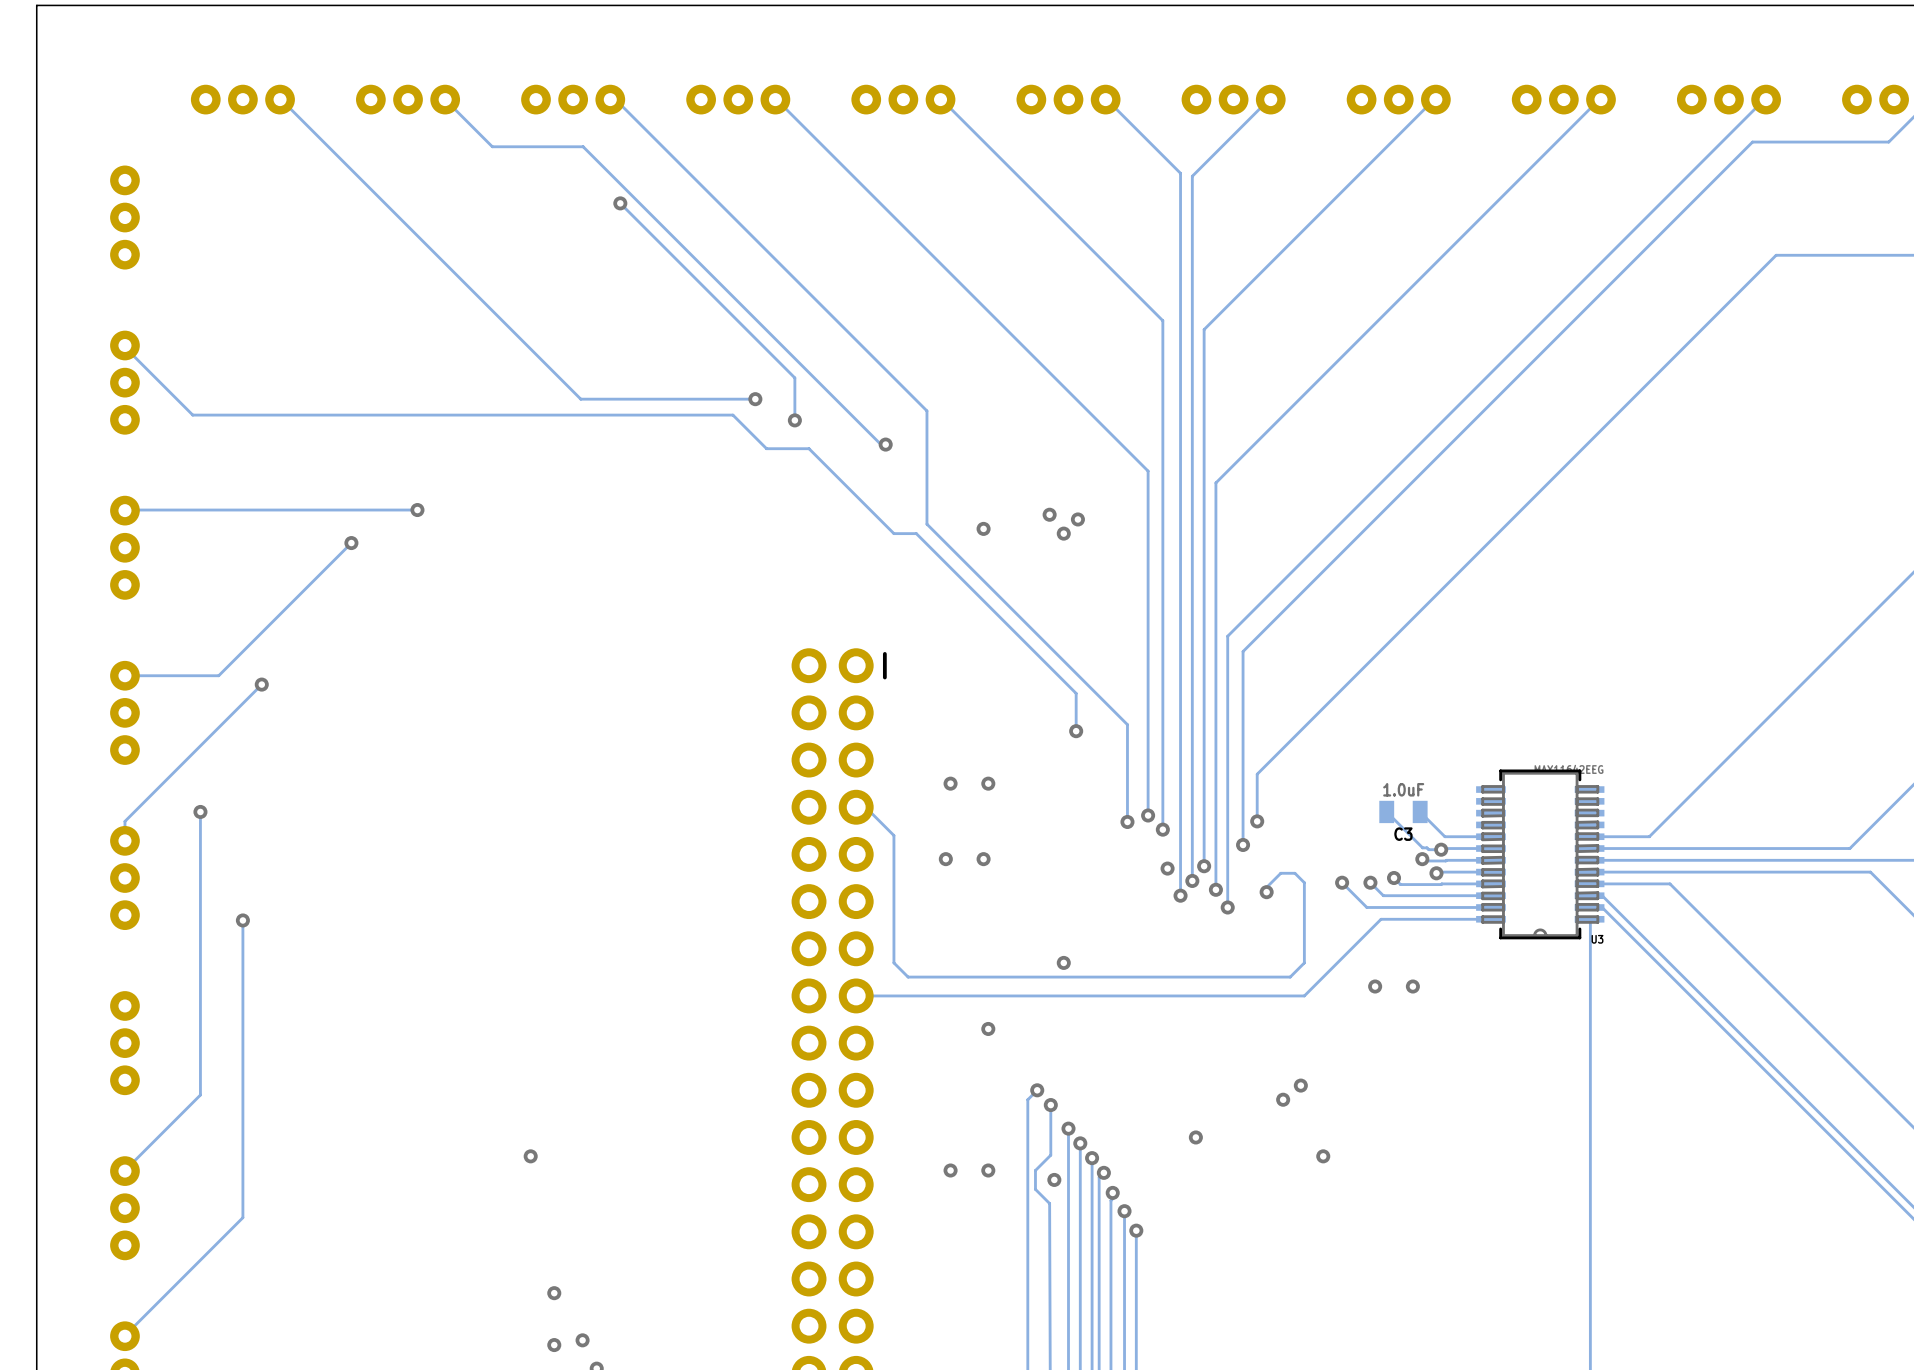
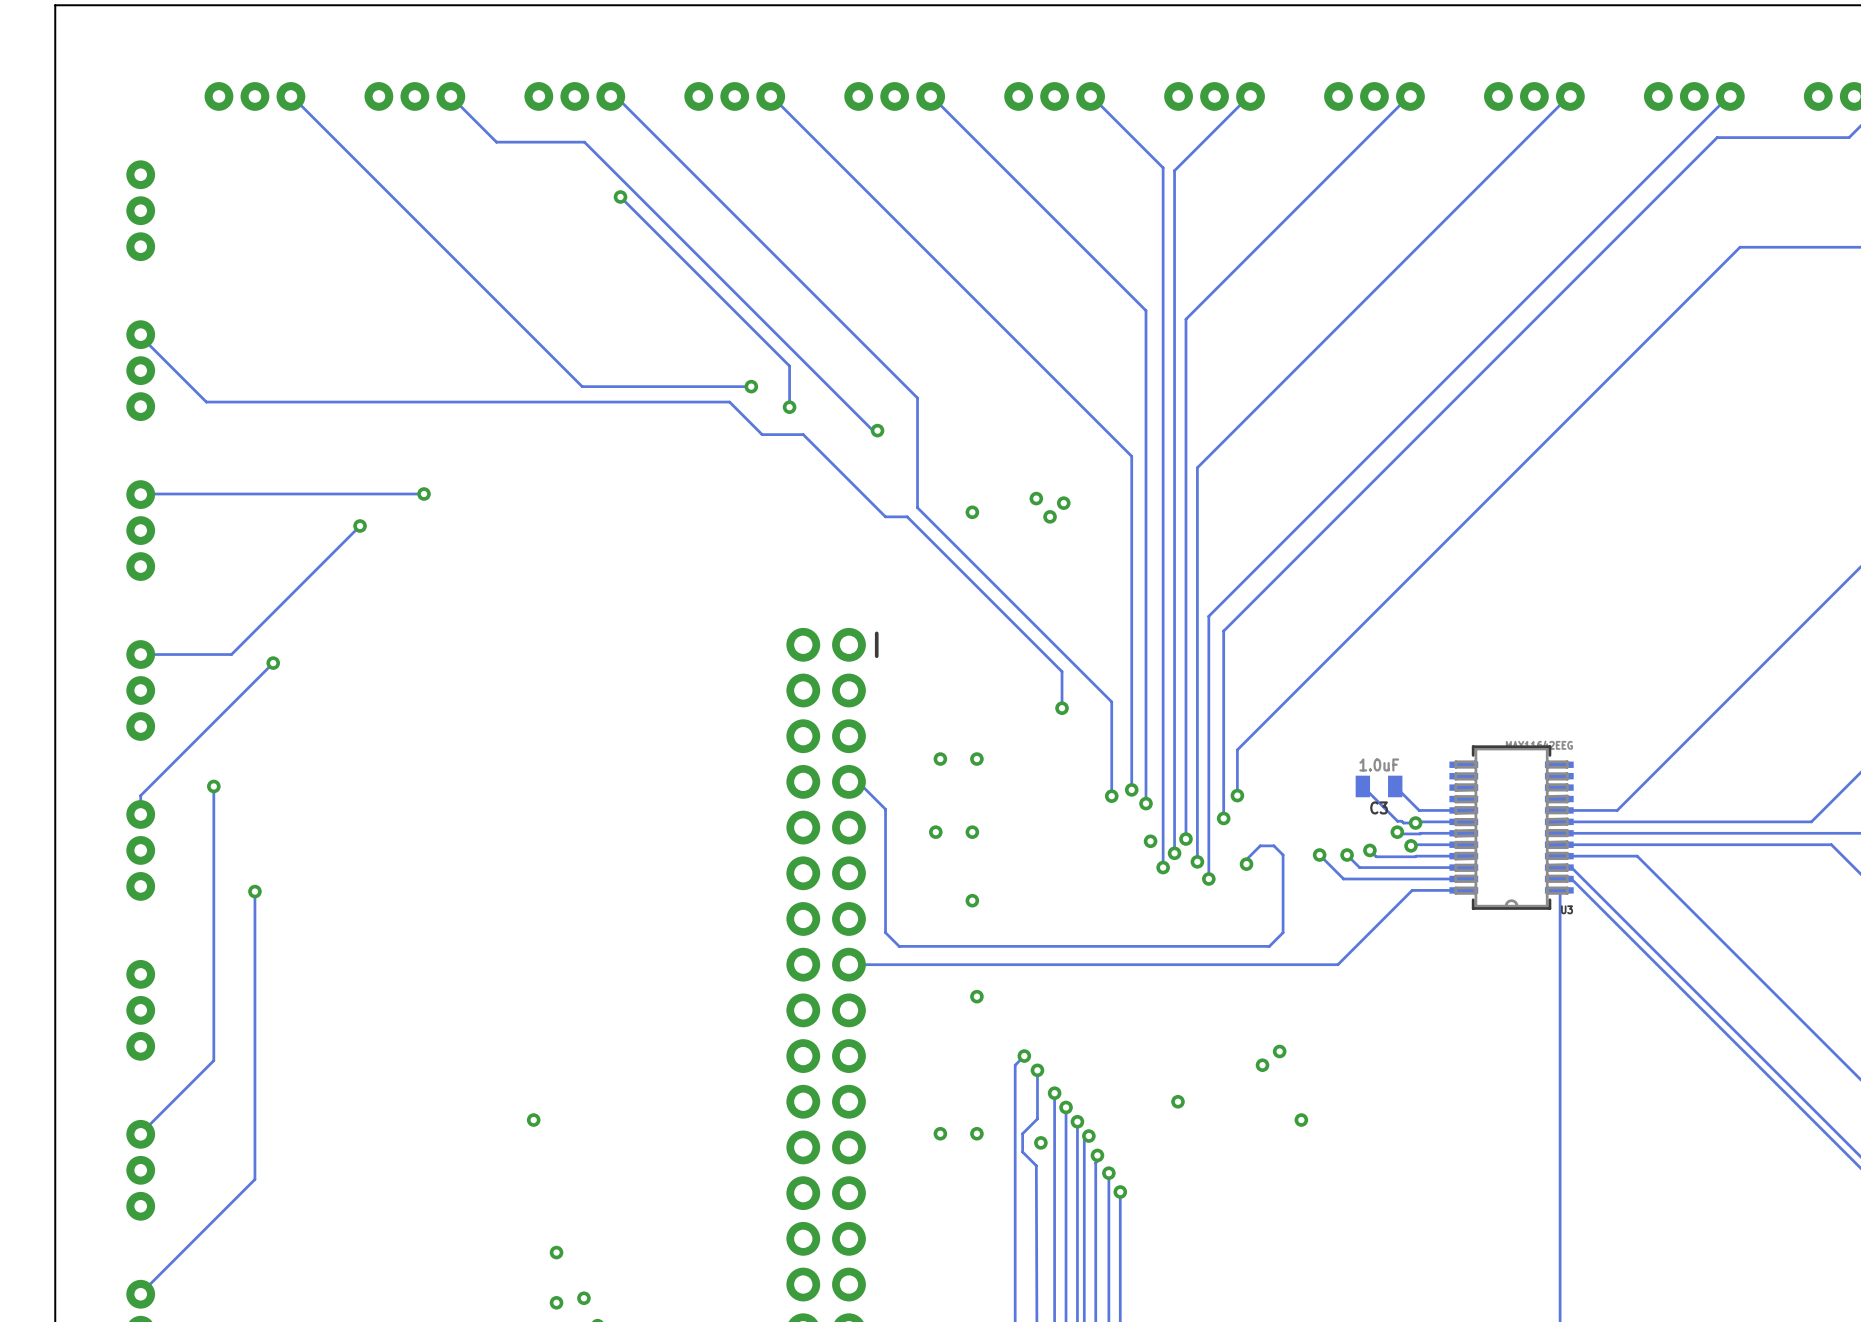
track: (1437, 919) (1381, 919) (1304, 995) -> (1412, 890) (1337, 964) (1283, 964)
via position: (1063, 962) -> (972, 900)
via: (1375, 986) -> none
via: (1412, 986) -> none

